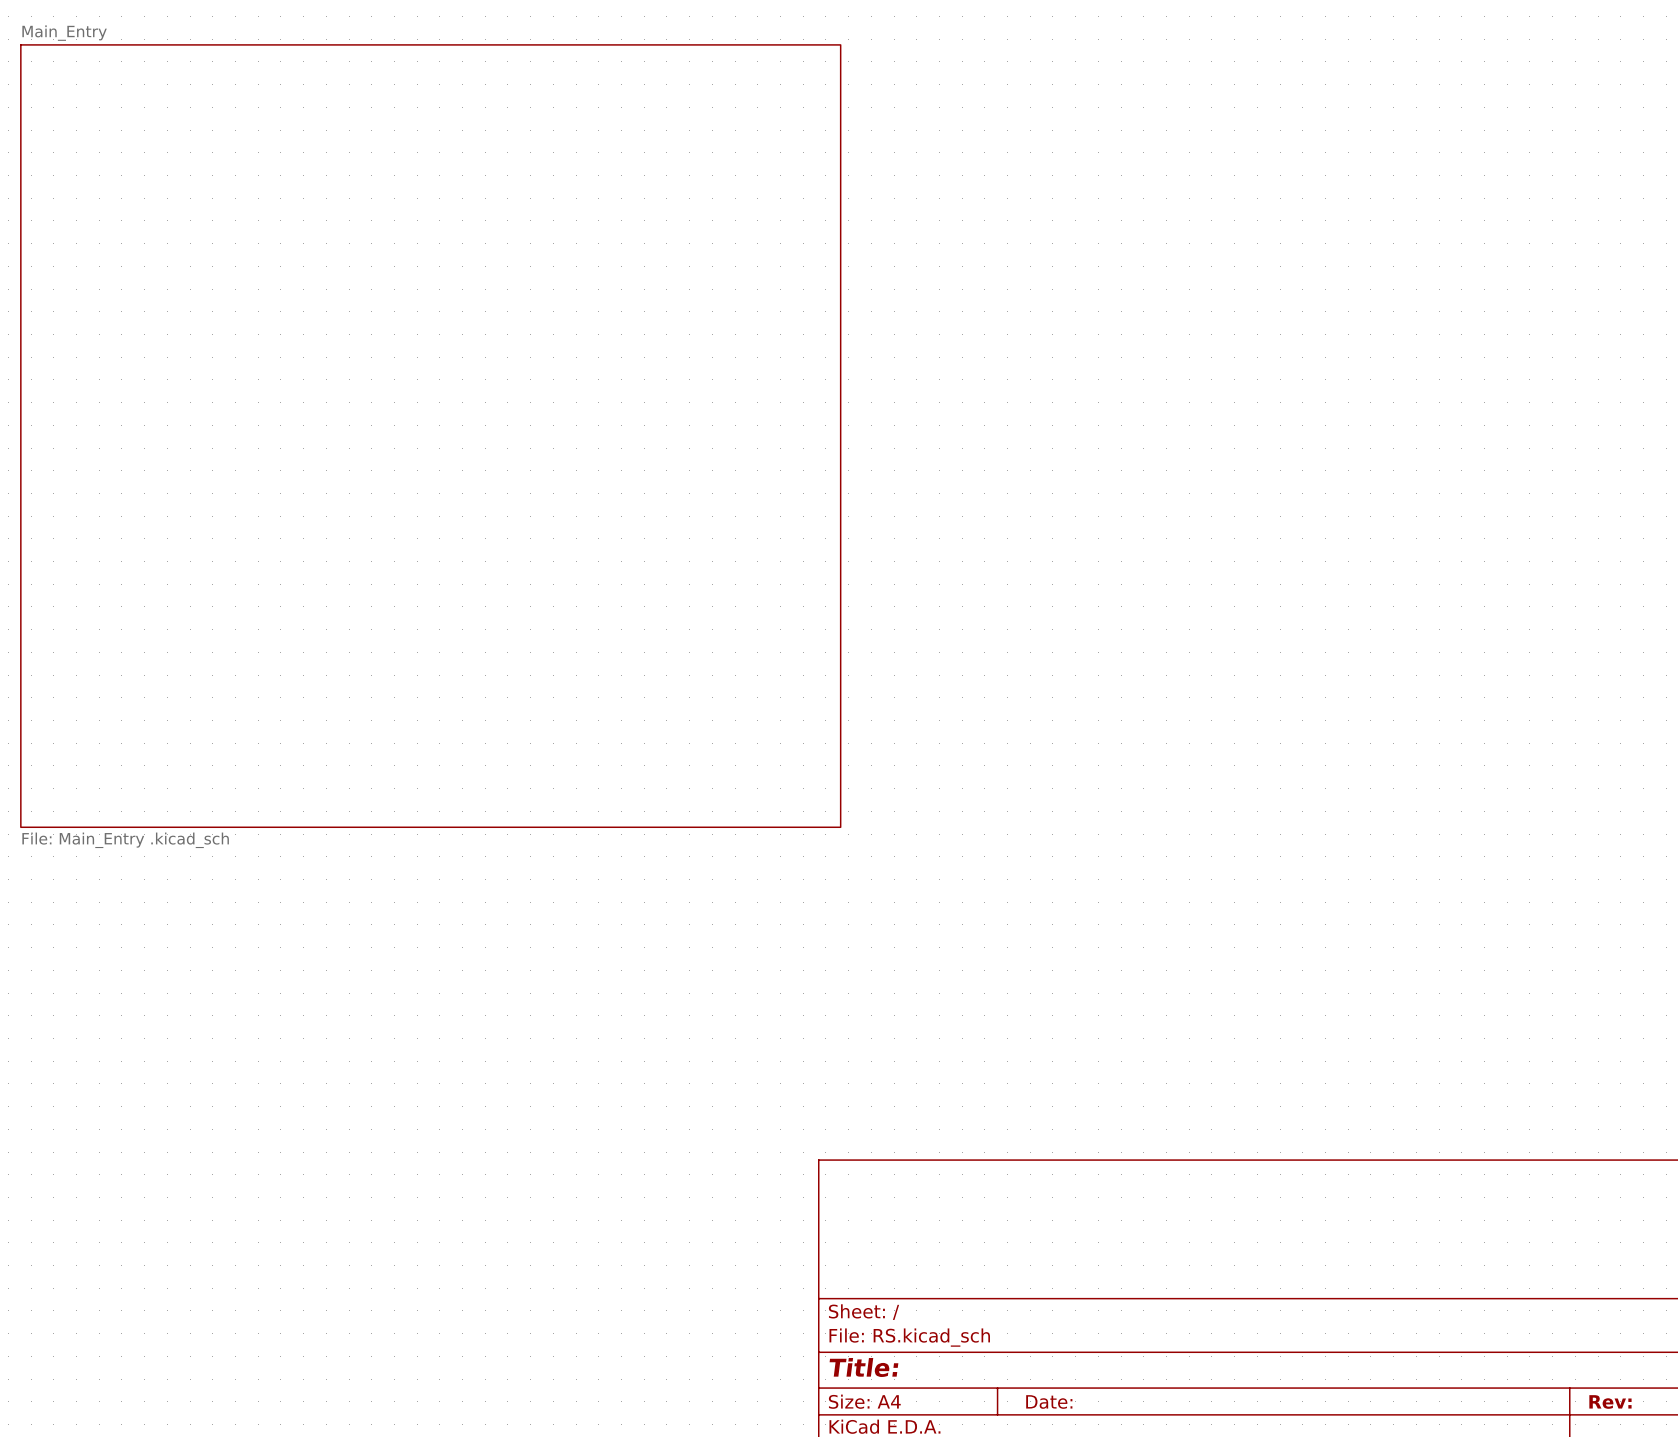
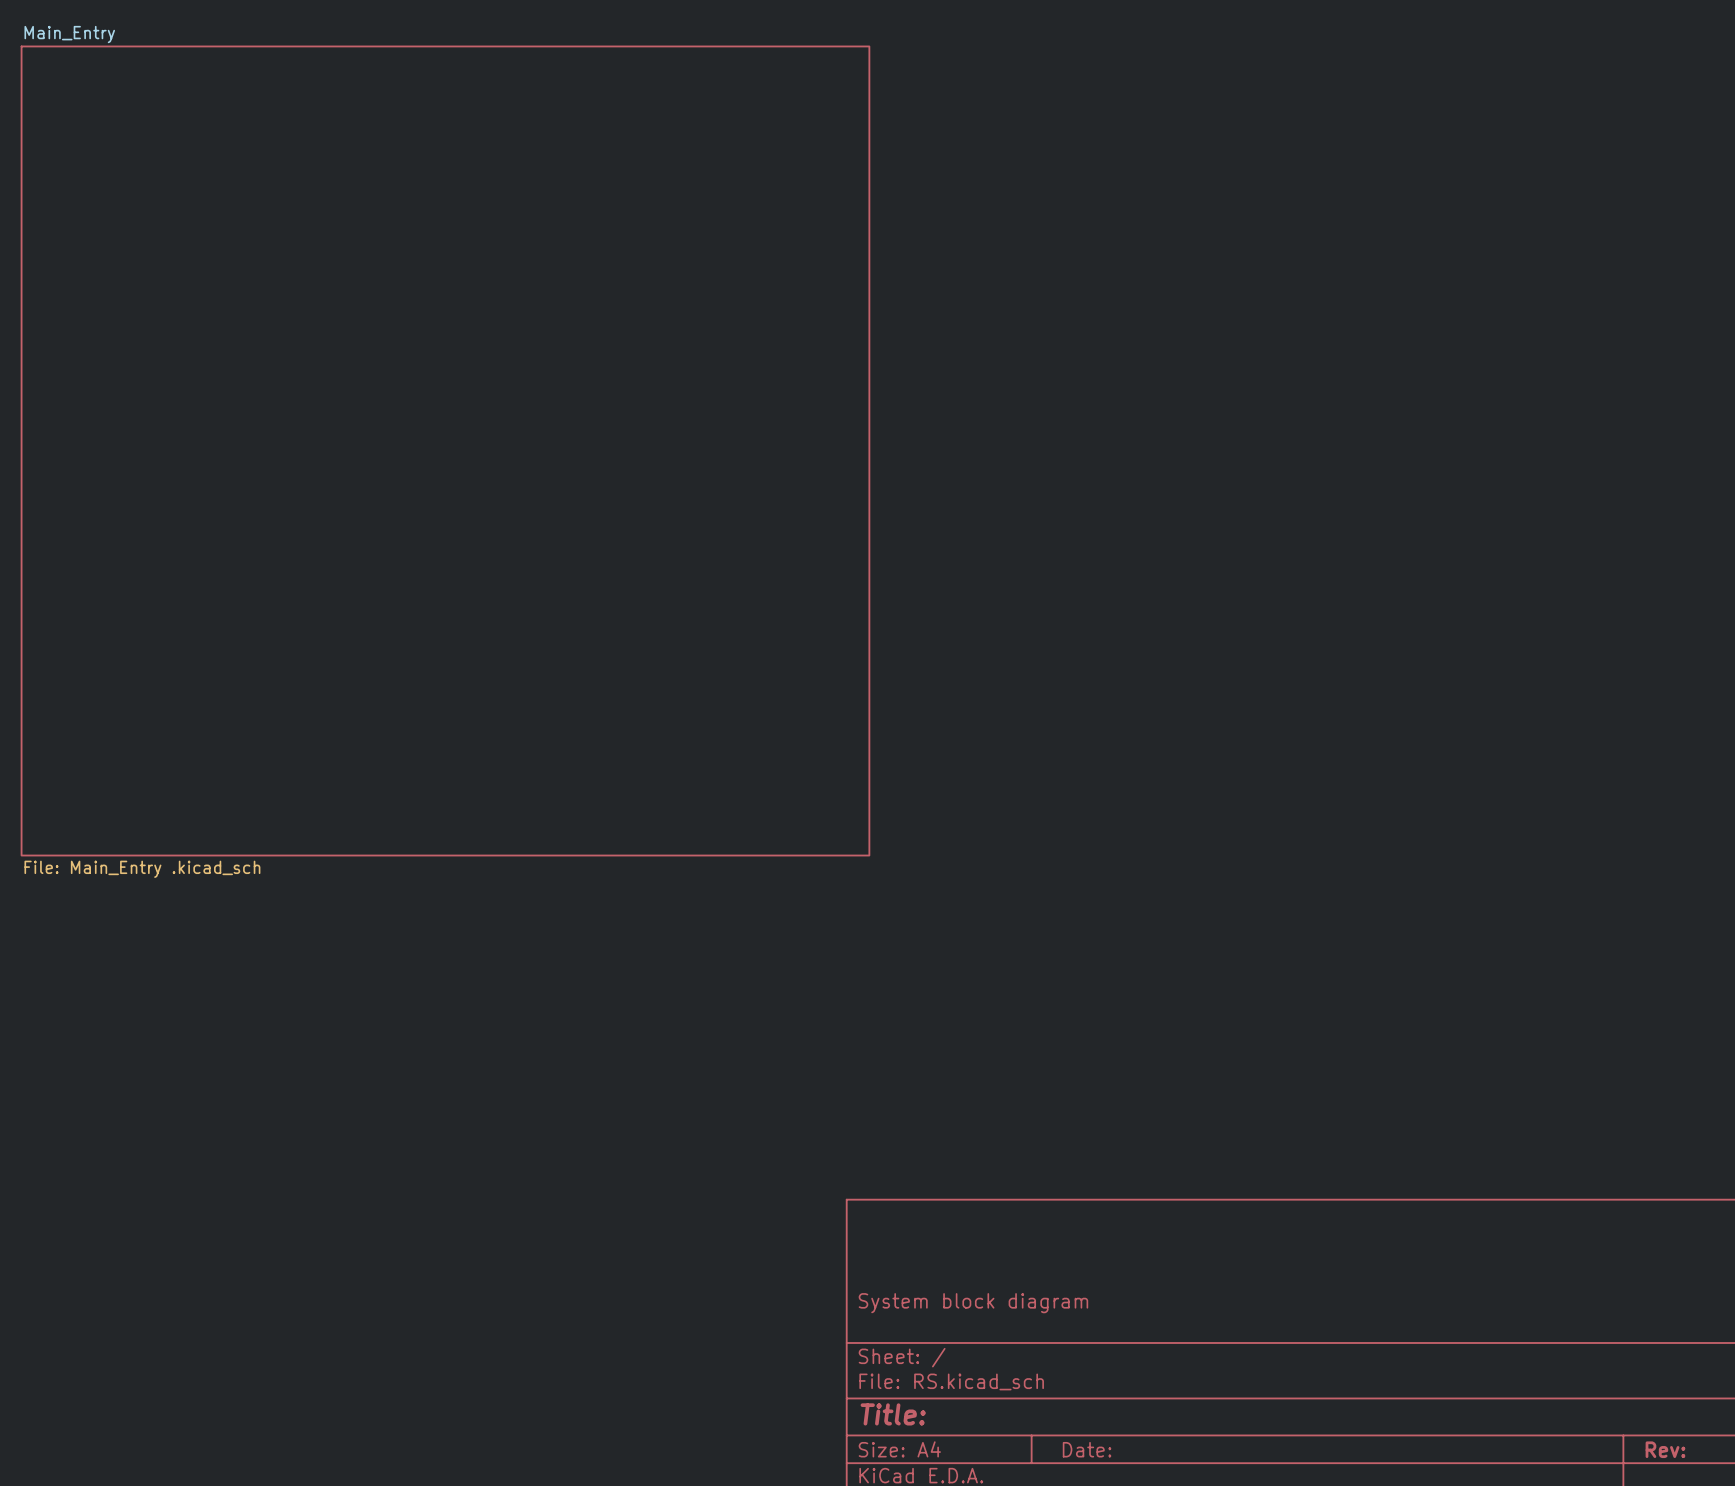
title block: none -> System block diagram (973, 1303)

